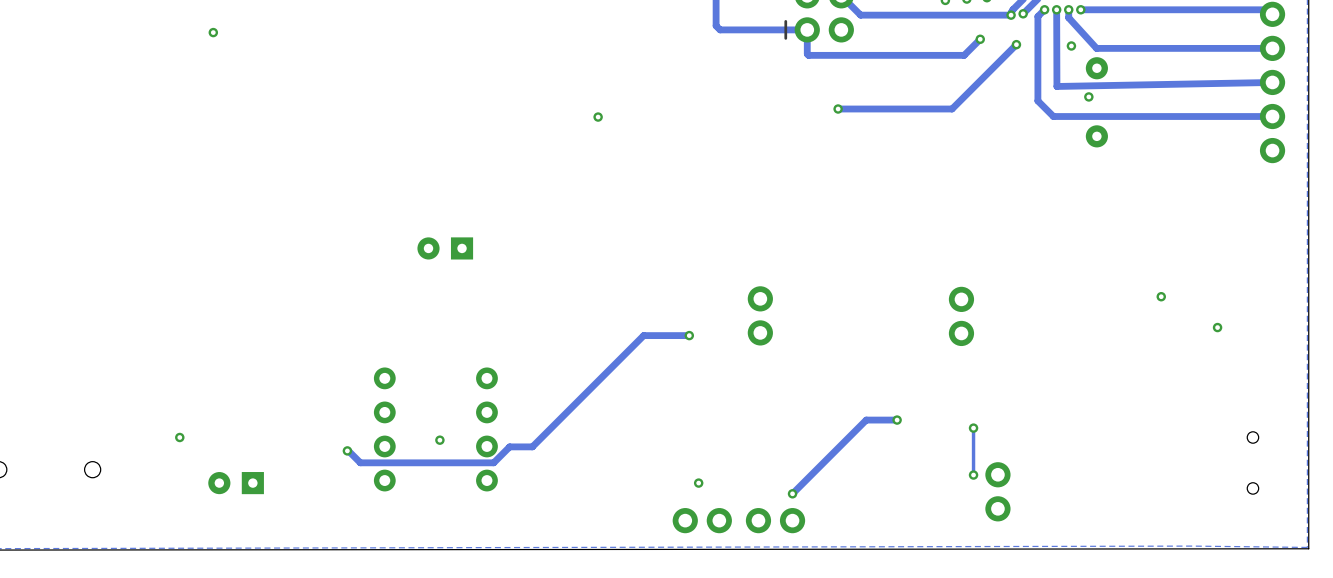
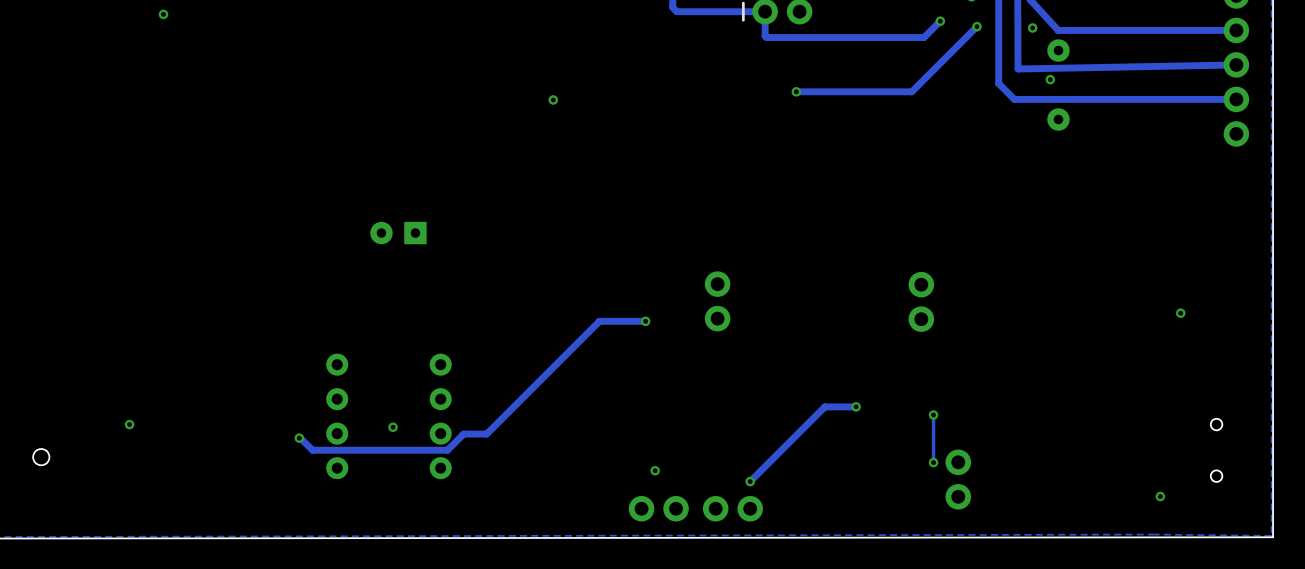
via: (1161, 296) -> none
part: (236, 483) -> none
via: none -> (1160, 496)

